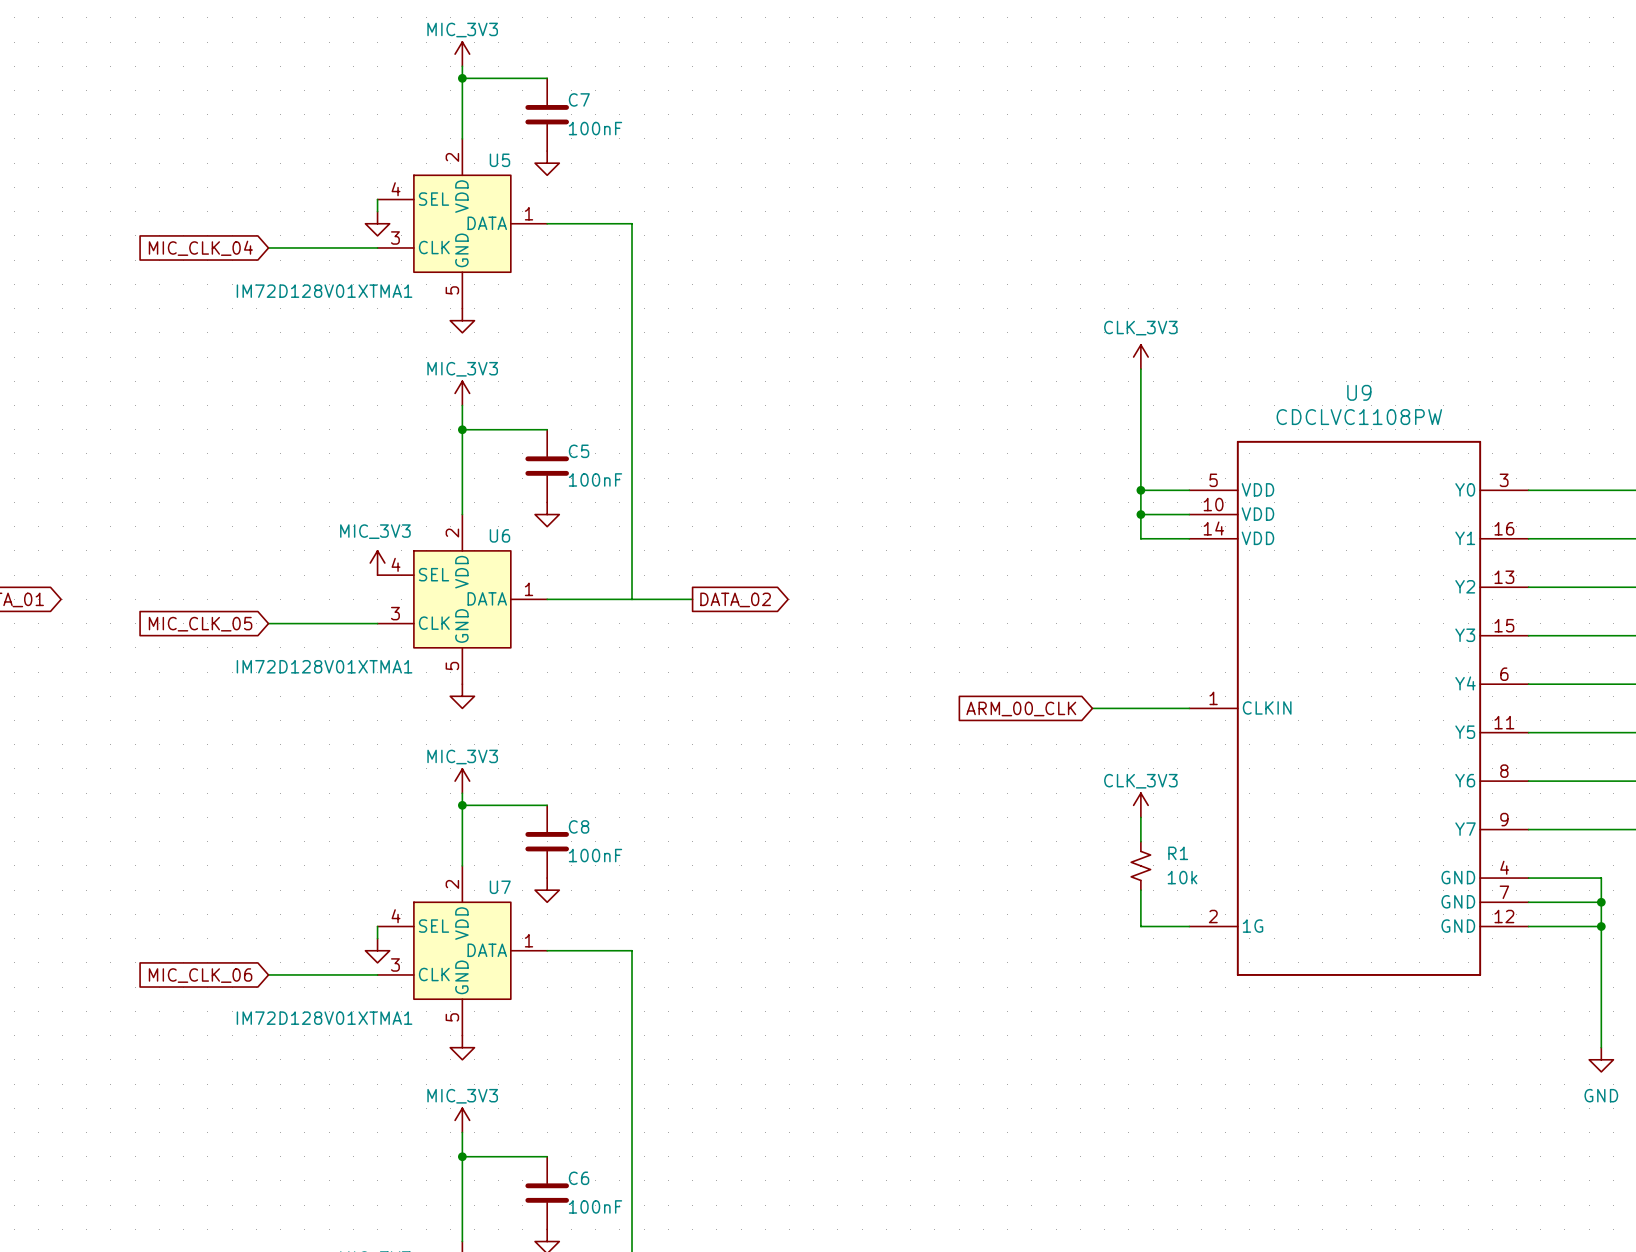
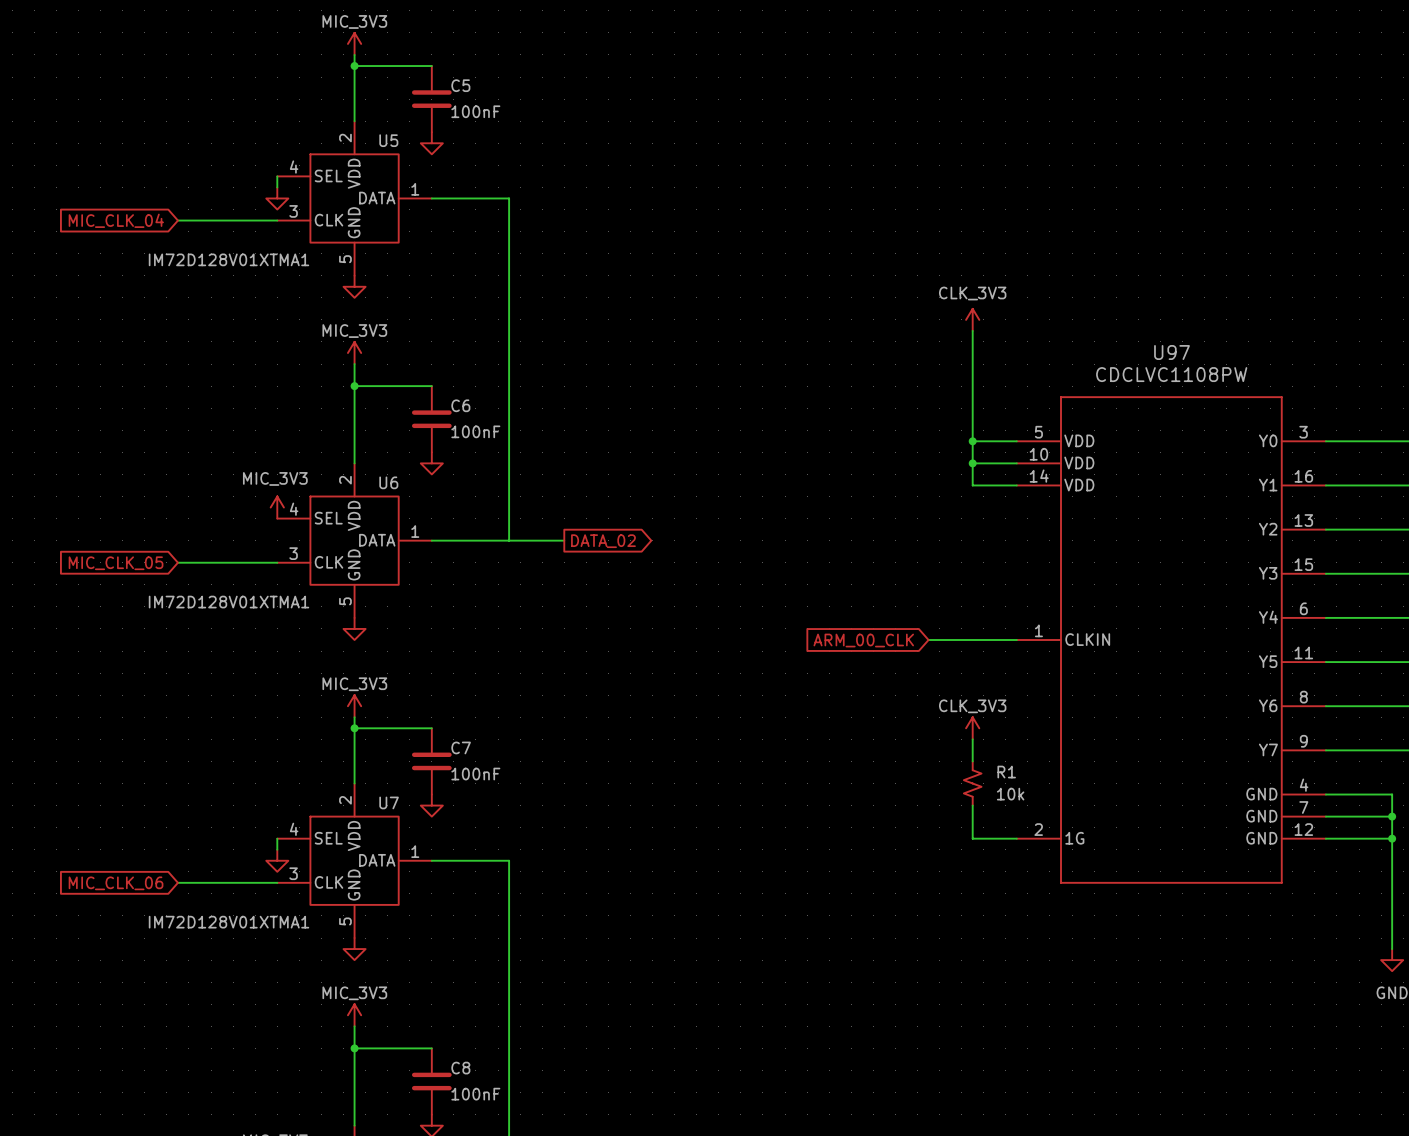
C7 name: C7 (579, 99) -> C5 (460, 85)
U9 name: U9 (1359, 392) -> U97 (1172, 352)
C5 name: C5 (579, 451) -> C6 (460, 405)
C8 name: C8 (579, 826) -> C7 (461, 747)
C6 name: C6 (579, 1178) -> C8 (460, 1068)

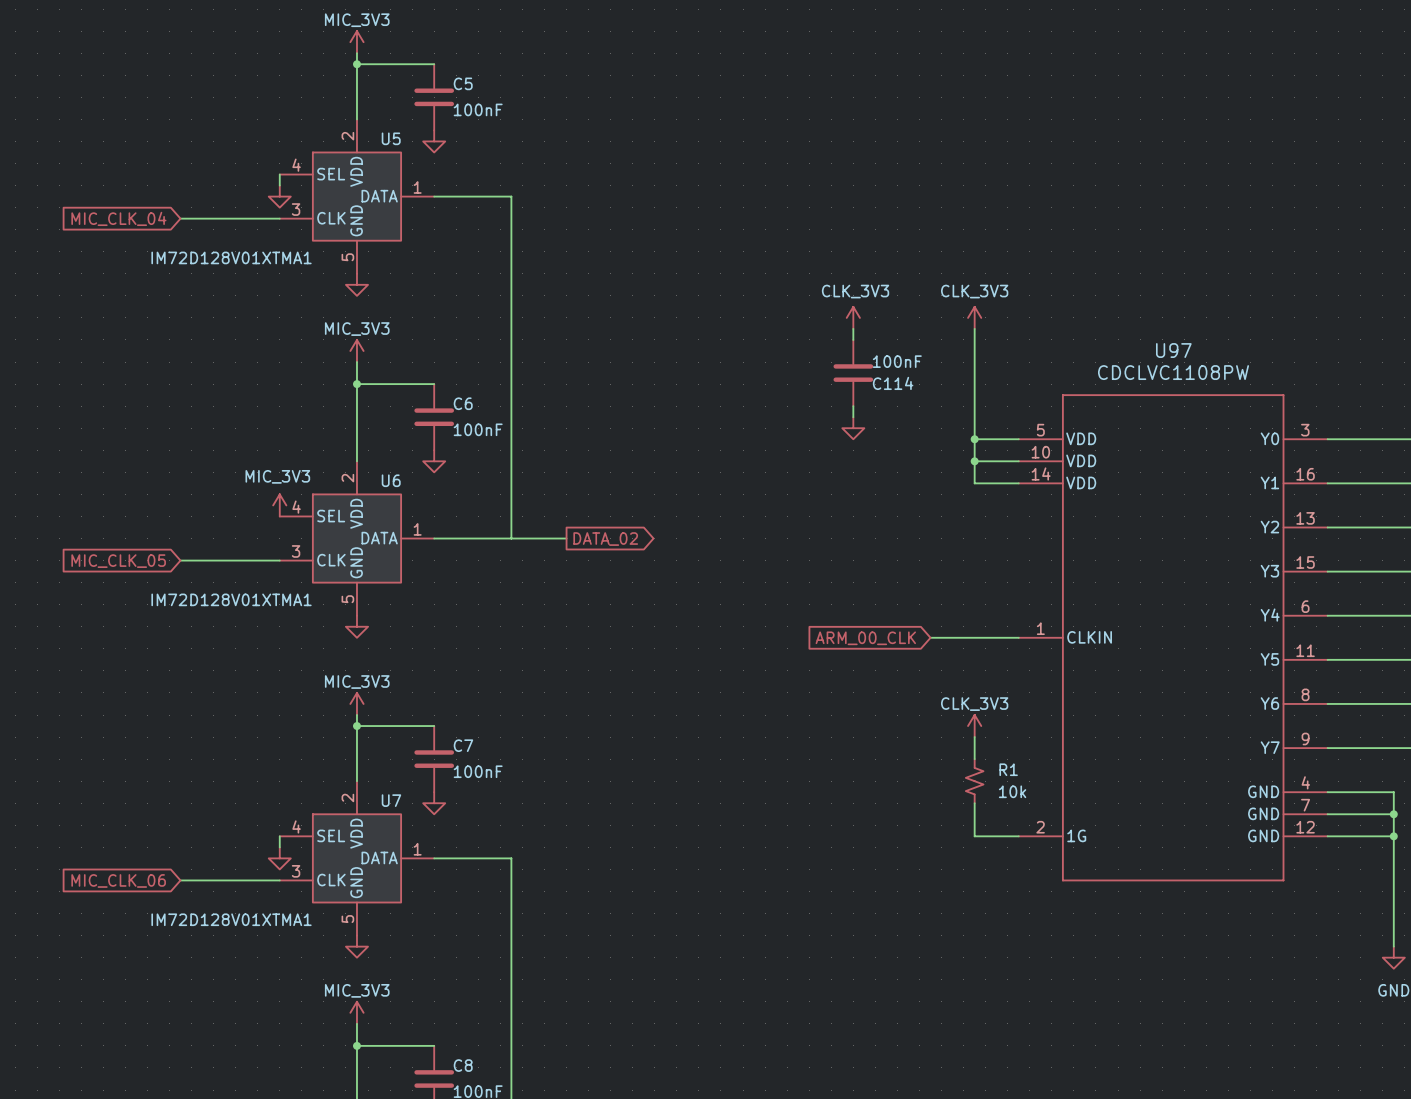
power symbol: none -> CLK_3V3 (853, 317)
wire: none -> (853, 328) (853, 339)
C114: none -> 100nF (853, 373)
wire: none -> (853, 406) (853, 417)
power symbol: none -> (853, 428)

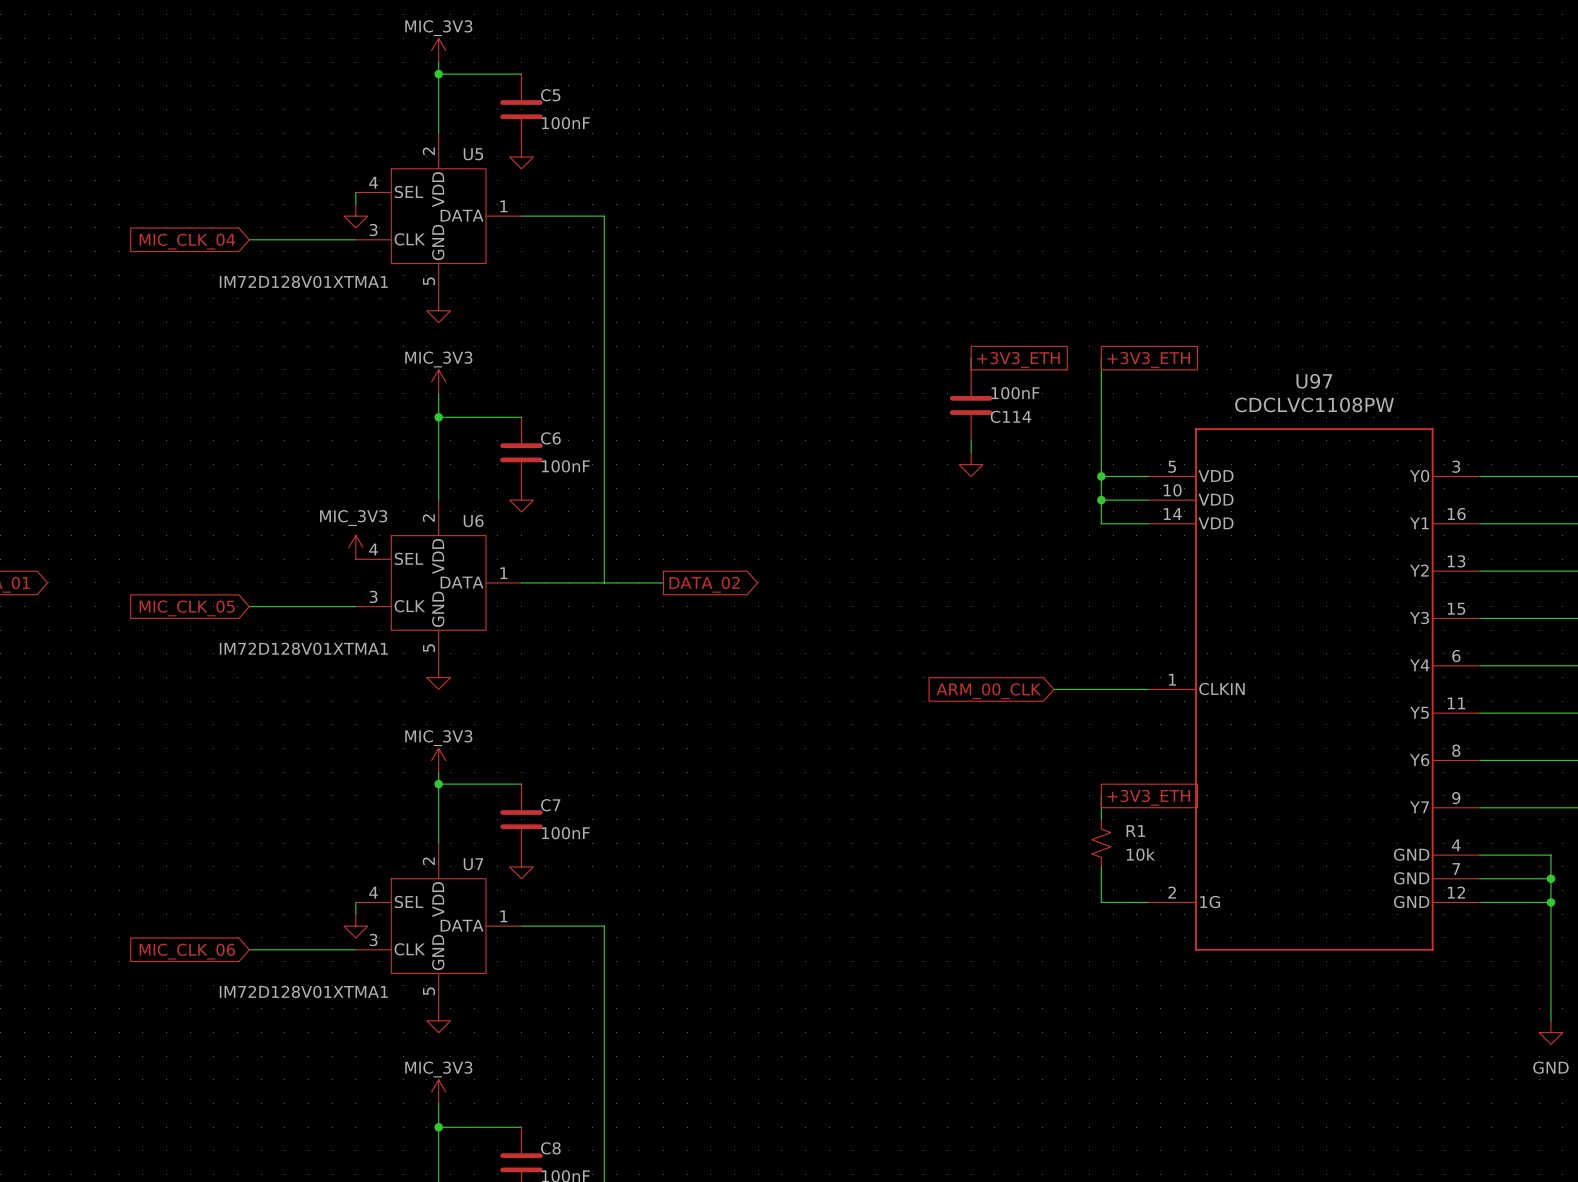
power symbol: CLK_3V3 (853, 317) -> none
power symbol: CLK_3V3 (974, 317) -> none
global label: none -> +3V3_ETH (1018, 359)
global label: none -> +3V3_ETH (1148, 359)
power symbol: CLK_3V3 (974, 726) -> none
global label: none -> +3V3_ETH (1148, 797)

